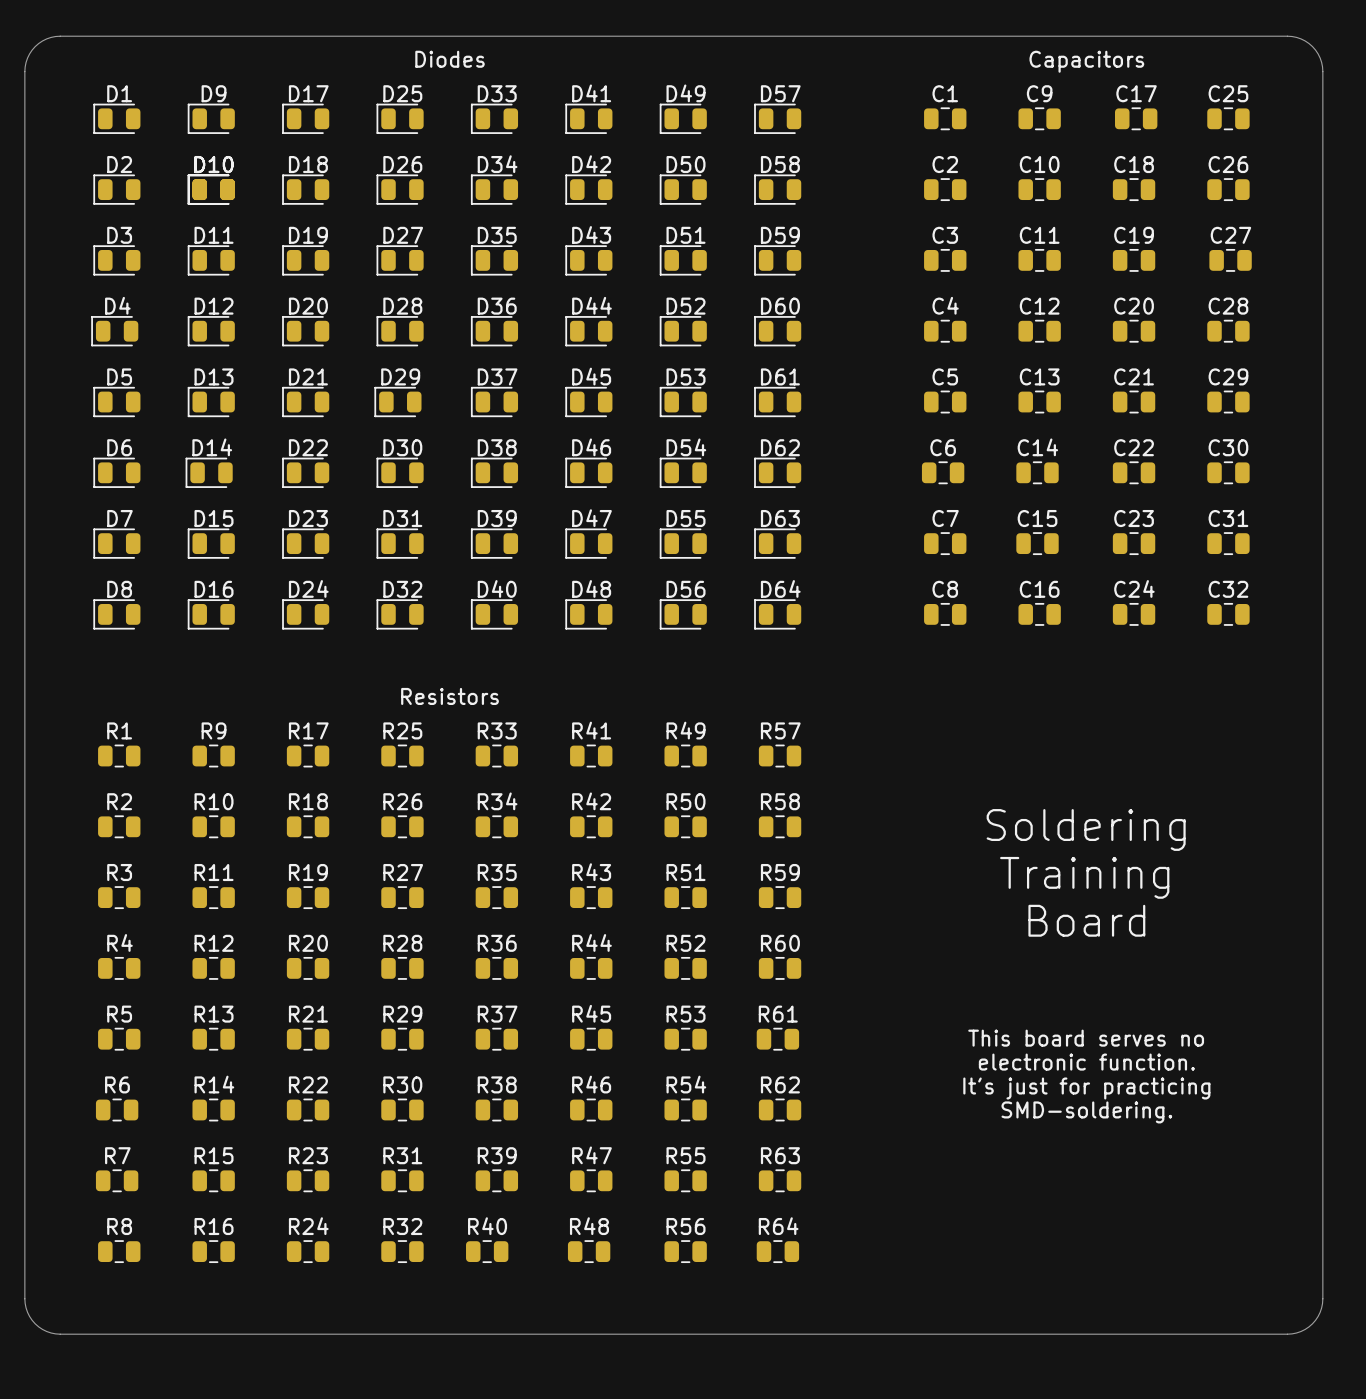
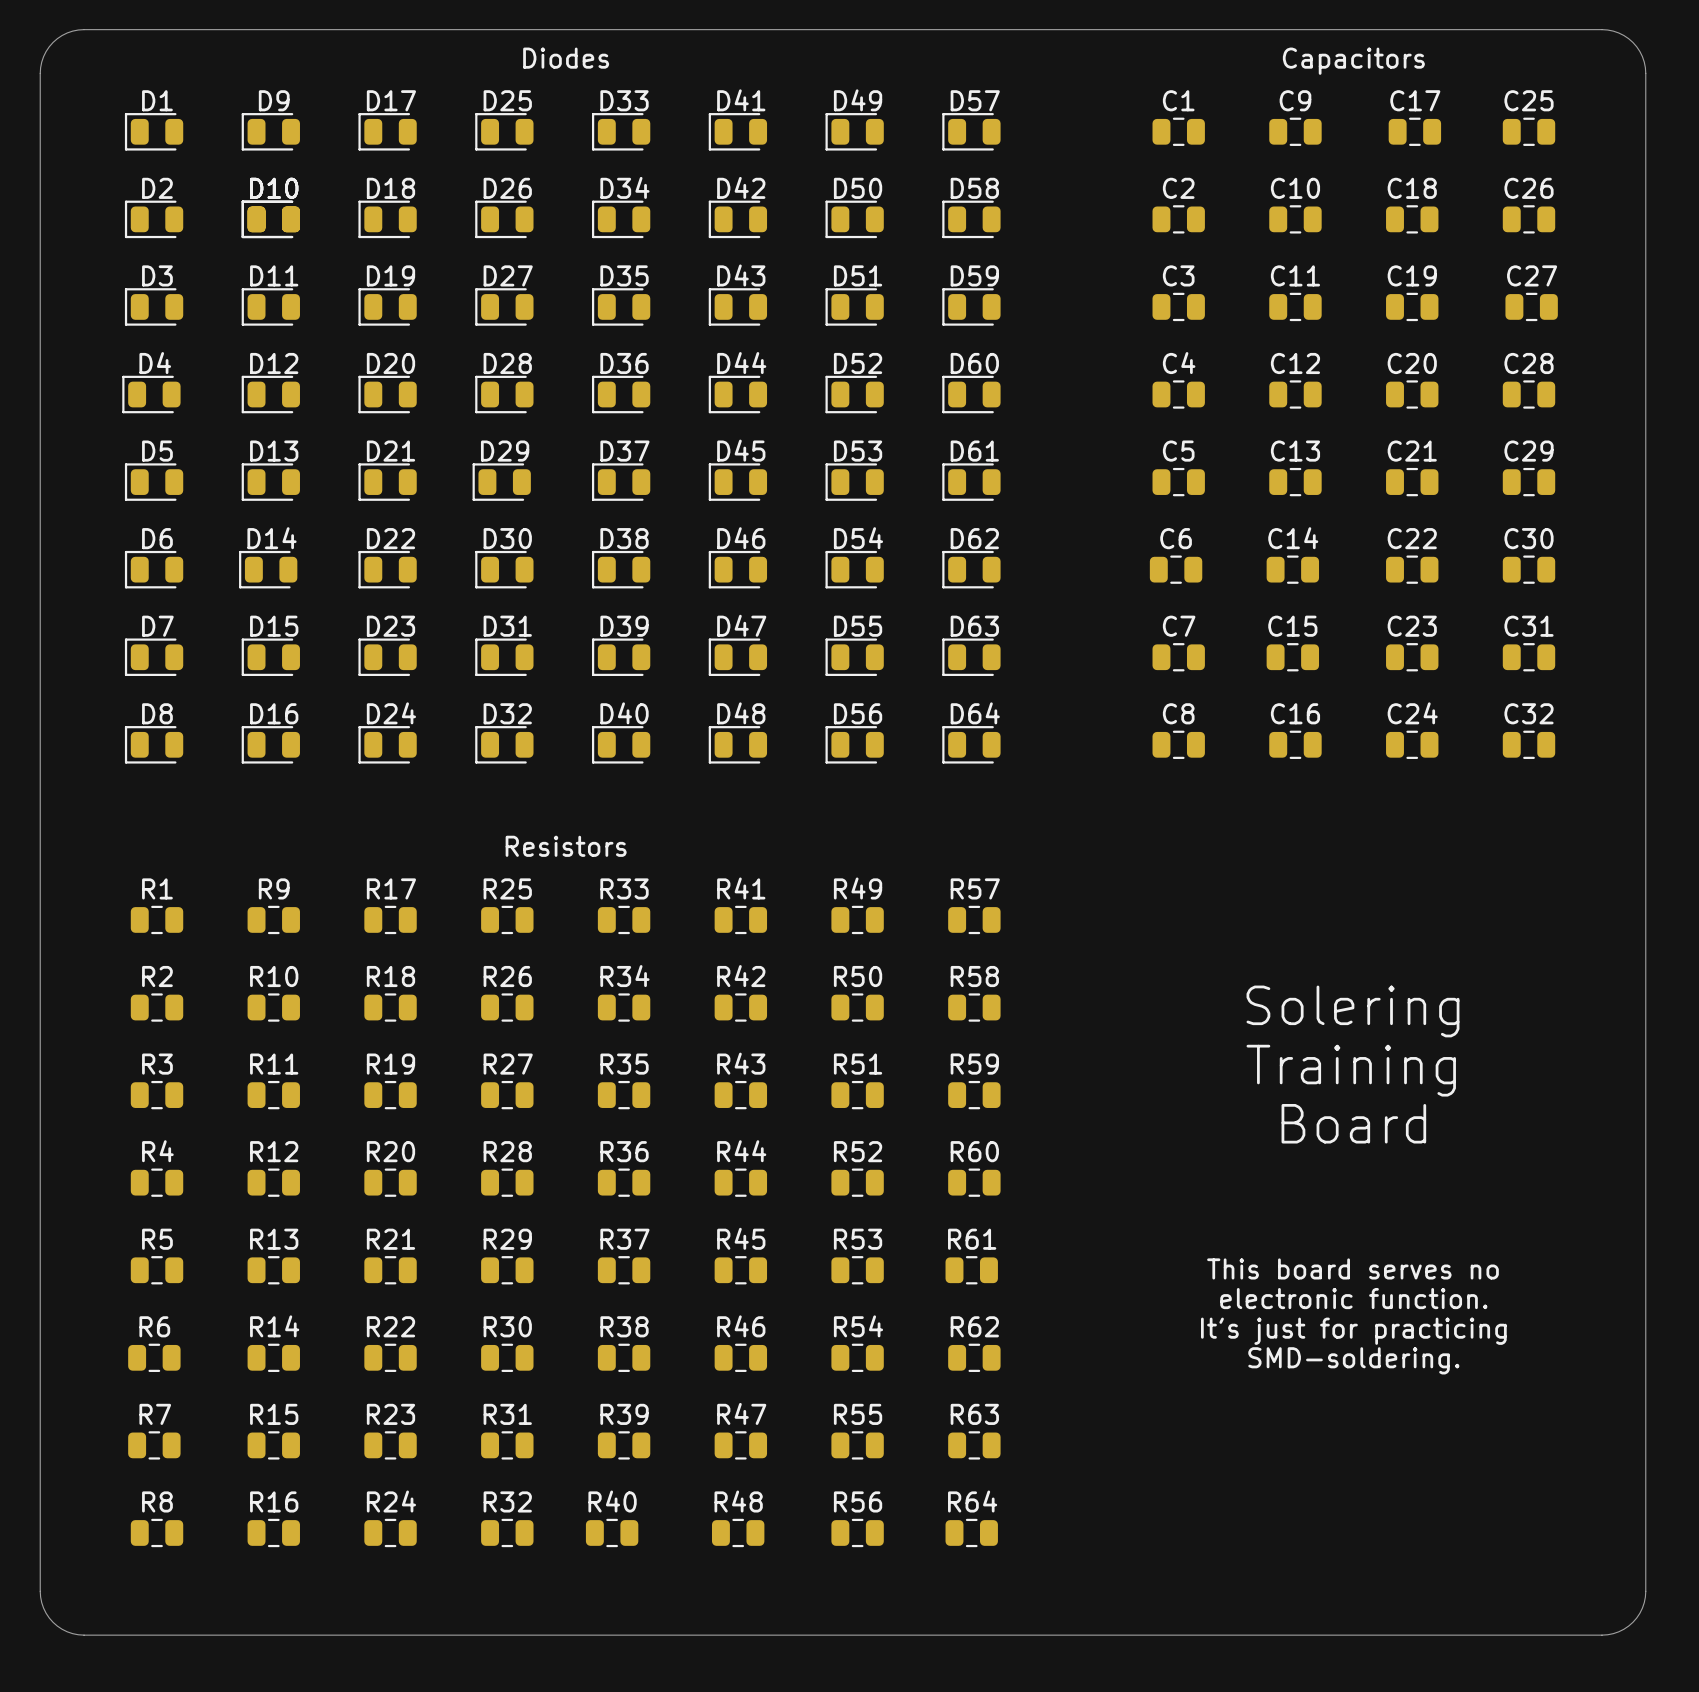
text: Soldering (1086, 829) -> Solering (1352, 1011)

